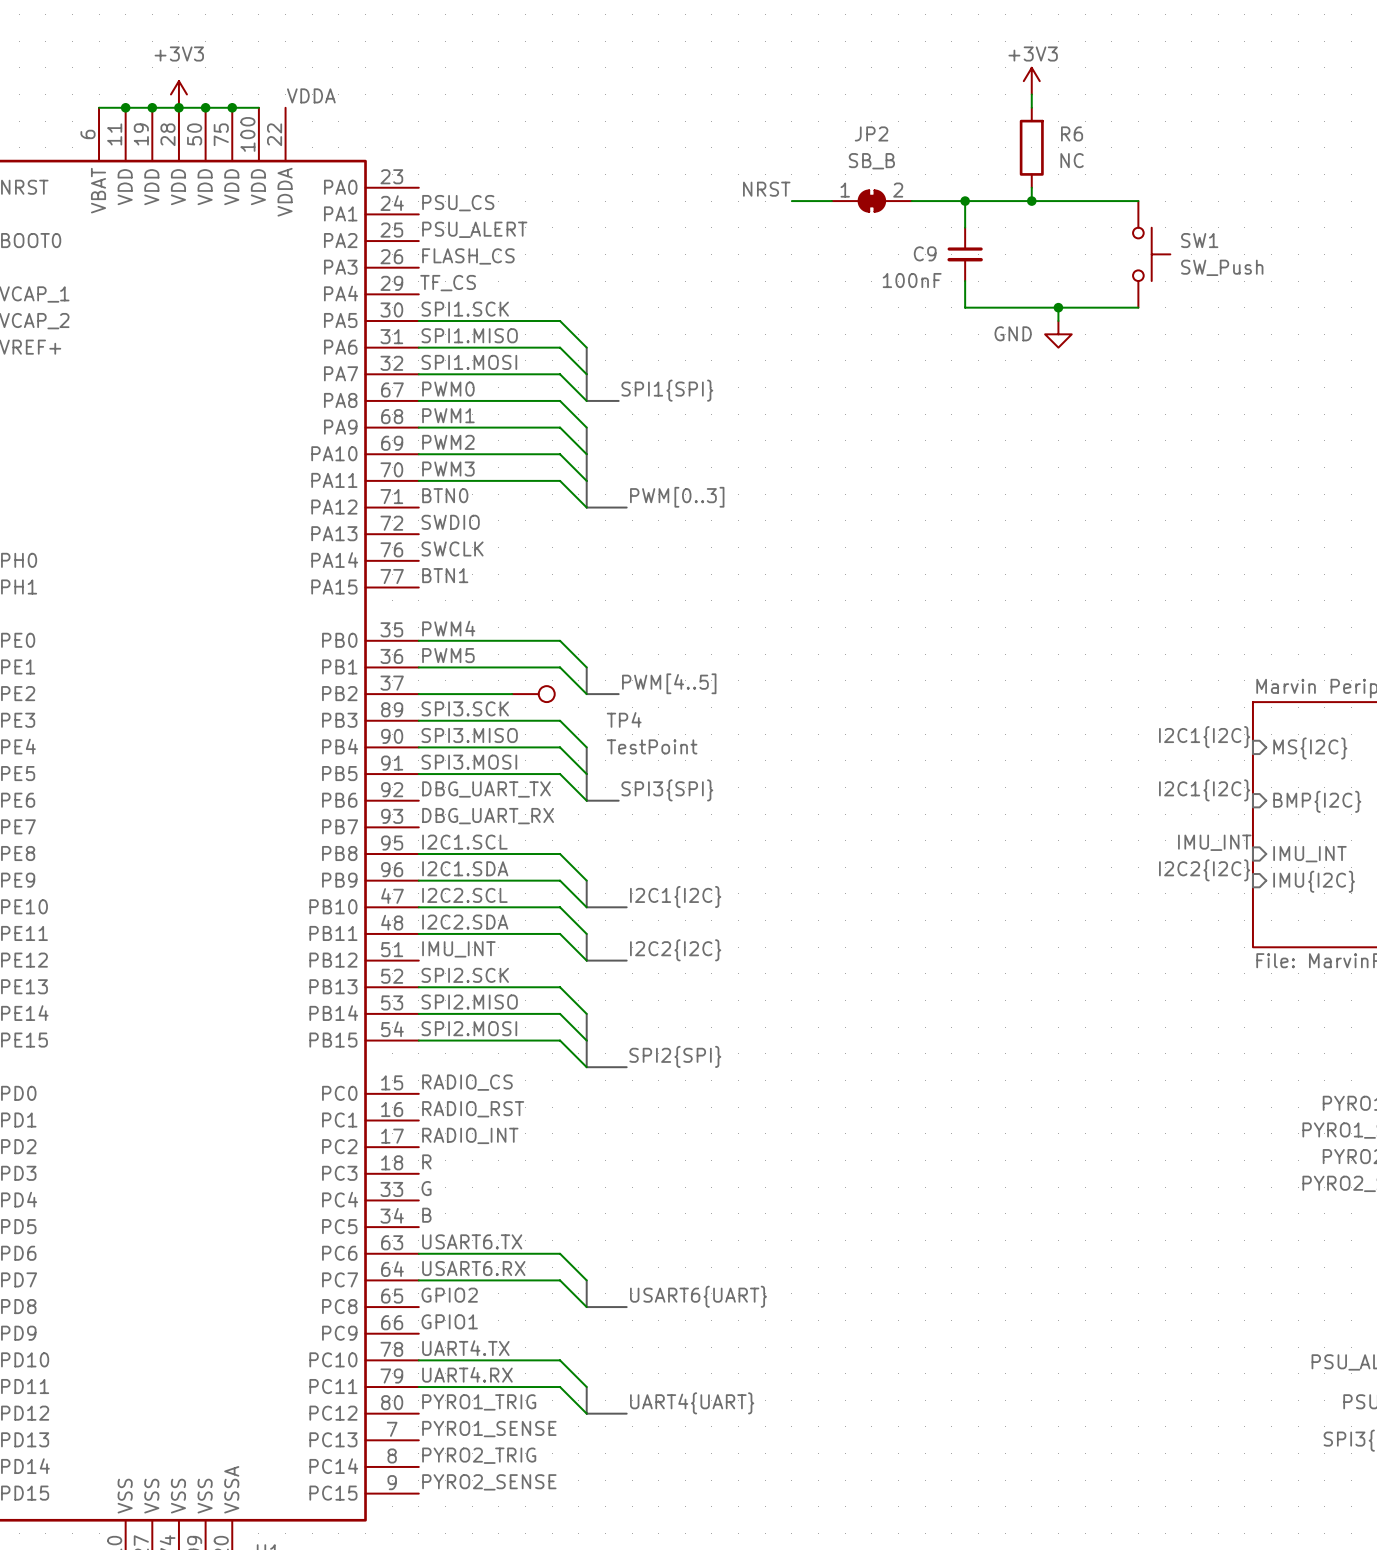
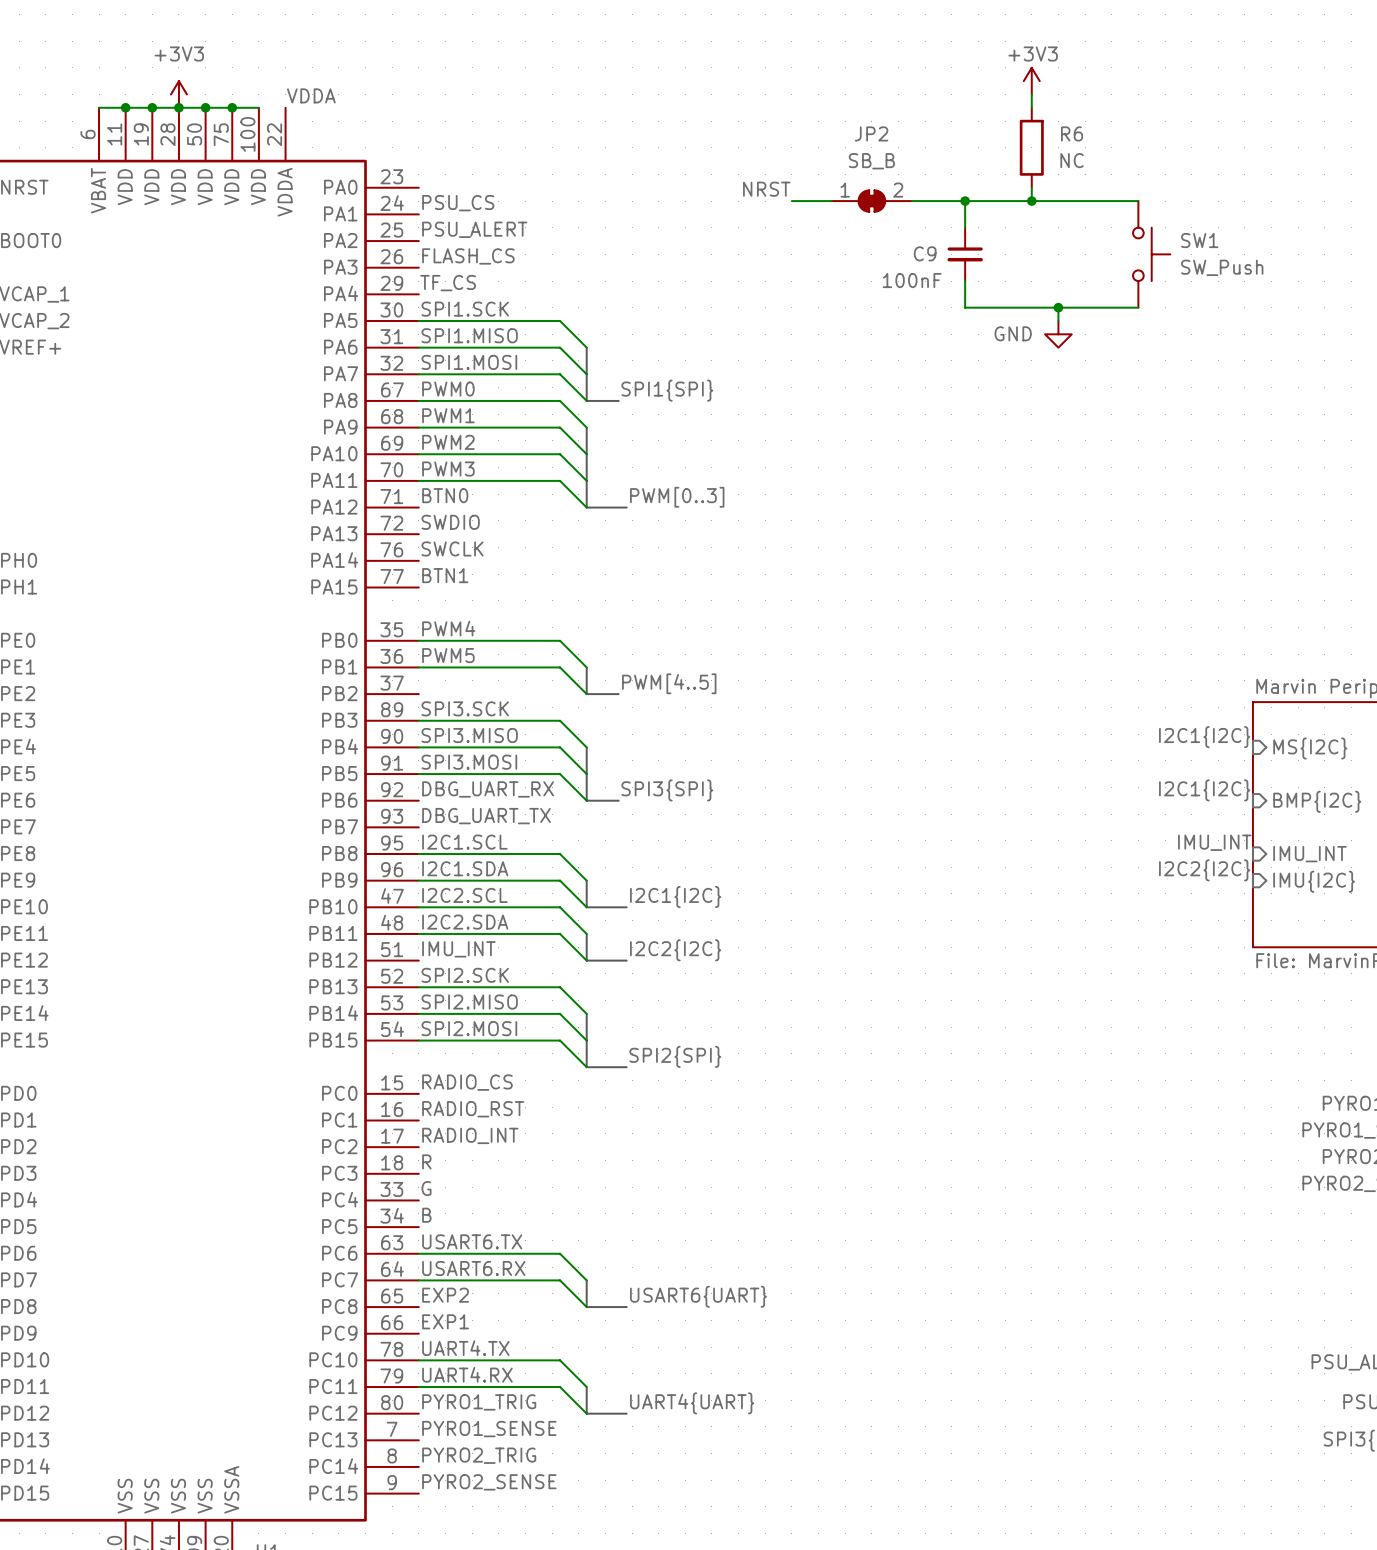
wire: (418, 694) (512, 694) -> none
TP4: TestPoint (533, 694) -> none
label: DBG_UART_TX (486, 789) -> DBG_UART_RX (488, 789)
label: DBG_UART_RX (488, 816) -> DBG_UART_TX (486, 816)
label: GPIO2 (449, 1295) -> EXP2 (445, 1295)
label: GPIO1 (449, 1321) -> EXP1 (445, 1321)

